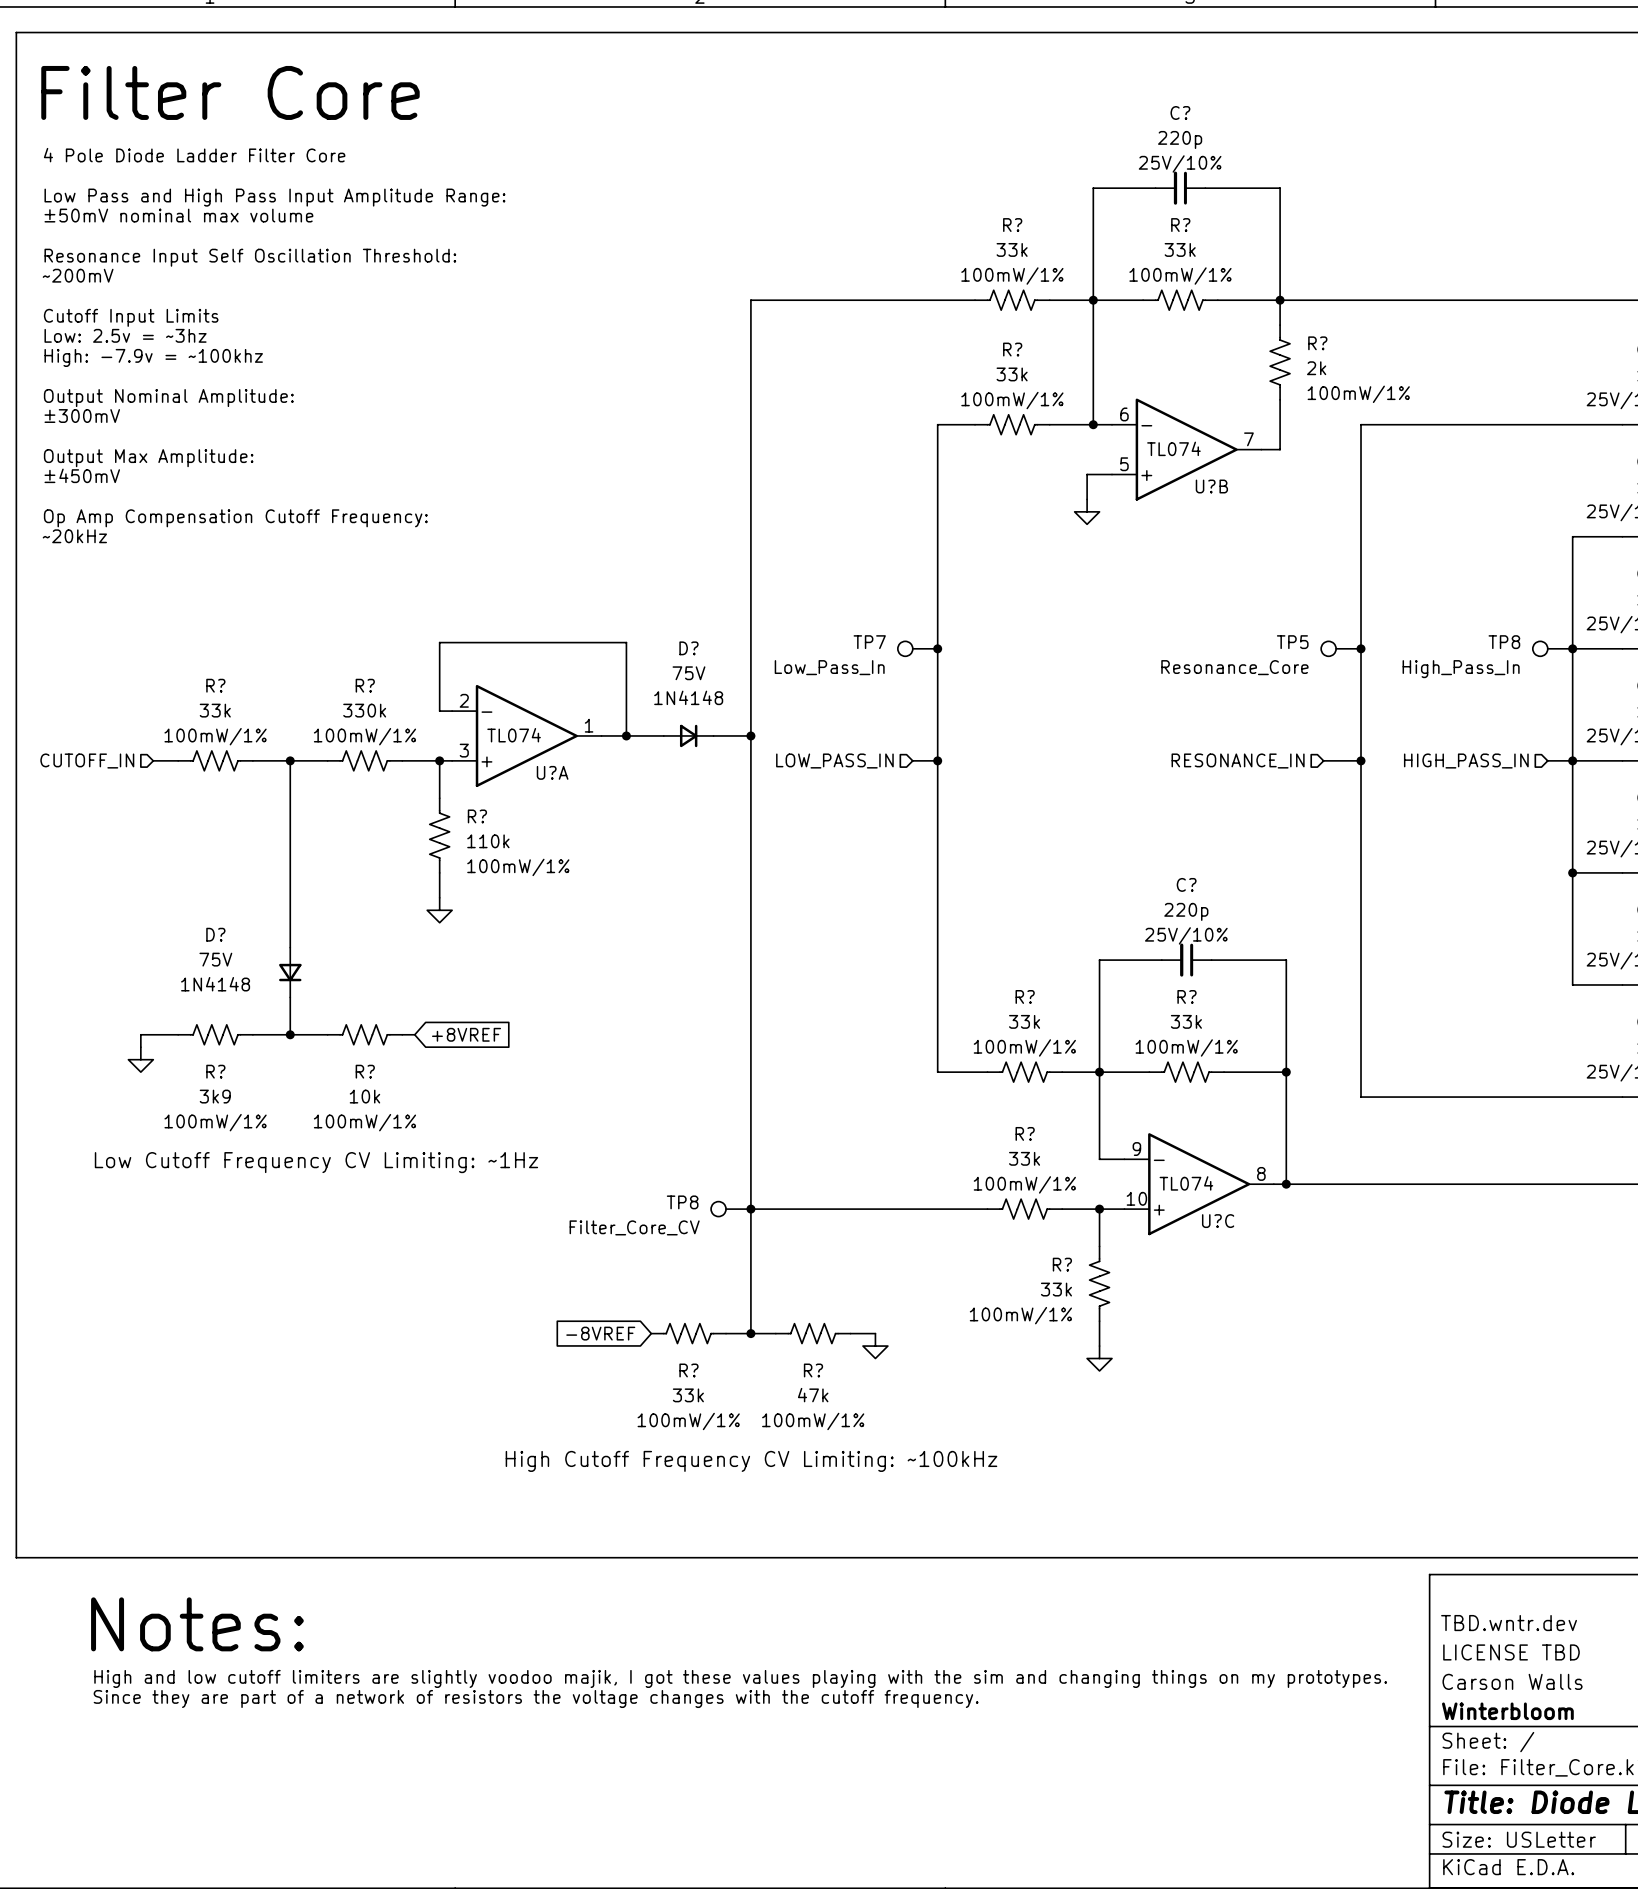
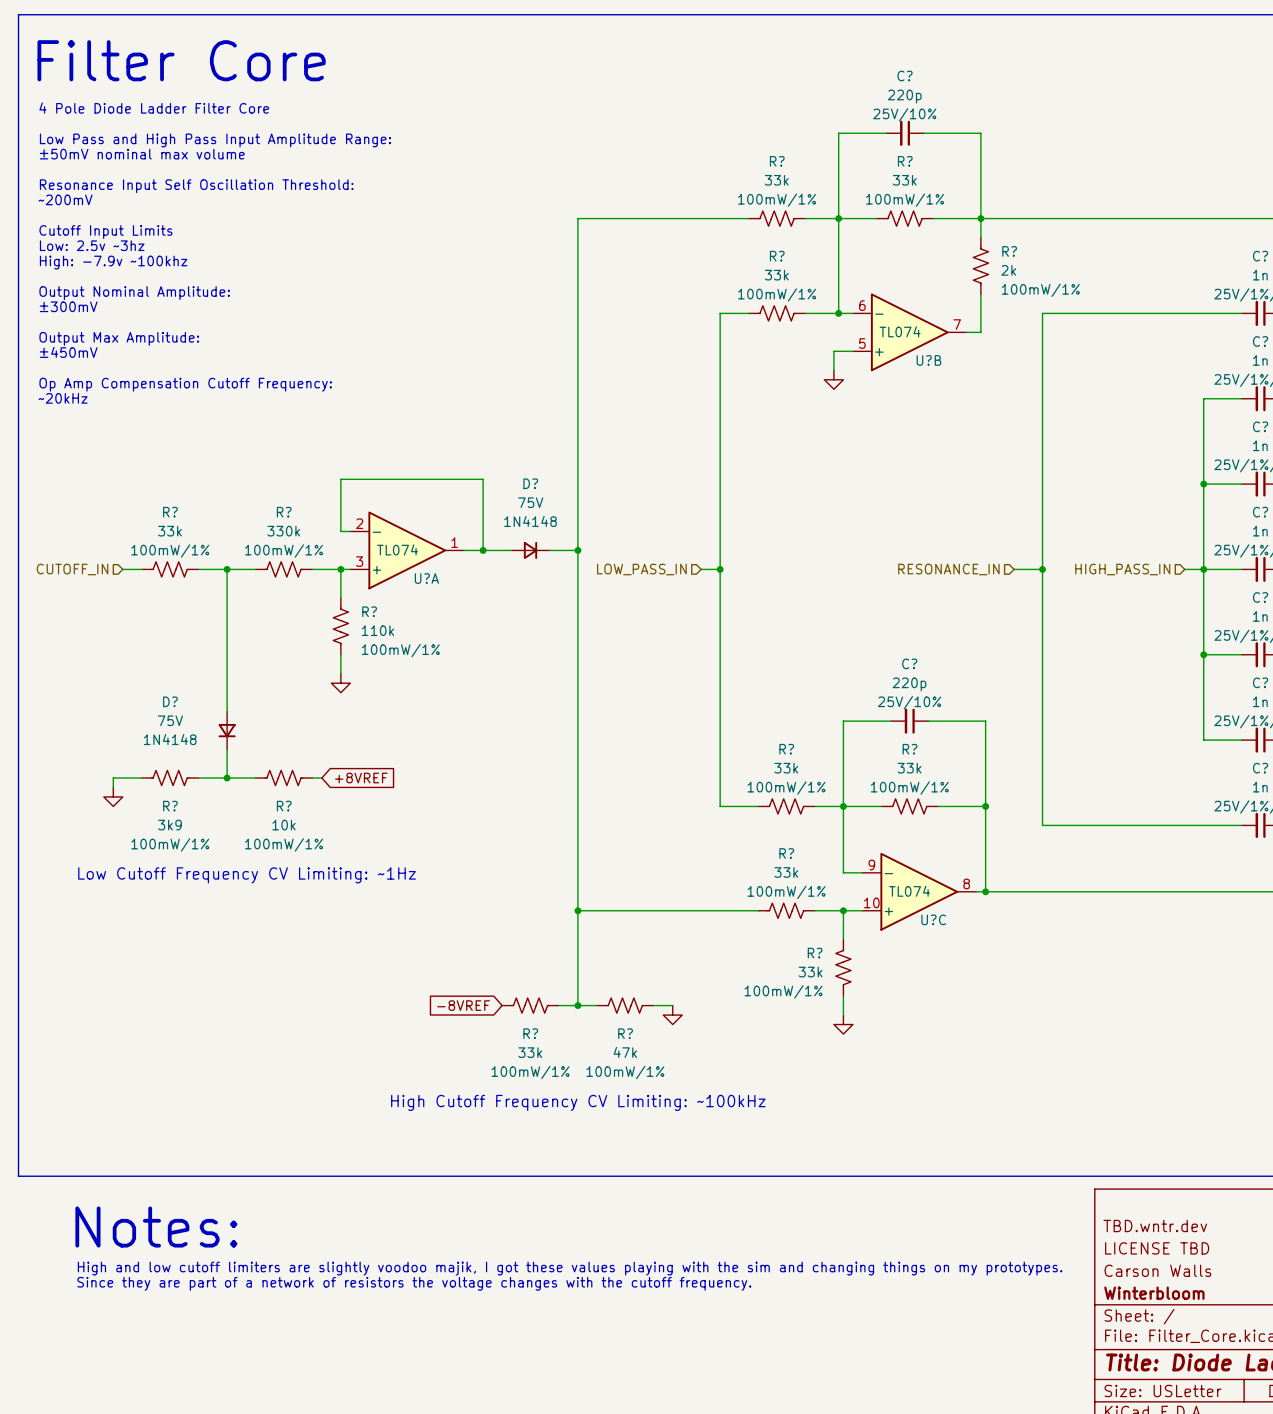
text: Low: 2.5v = ~3hz (125, 335) -> Low: 2.5v ~3hz (92, 245)
text: High: -7.9v = ~100khz (153, 357) -> High: -7.9v ~100khz (113, 262)
TP7: Low_Pass_In (917, 648) -> none
junction: (937, 648) -> none
TP5: Resonance_Core (1341, 648) -> none
junction: (1361, 648) -> none
TP8: High_Pass_In (1552, 648) -> none
TP8: Filter_Core_CV (731, 1209) -> none

